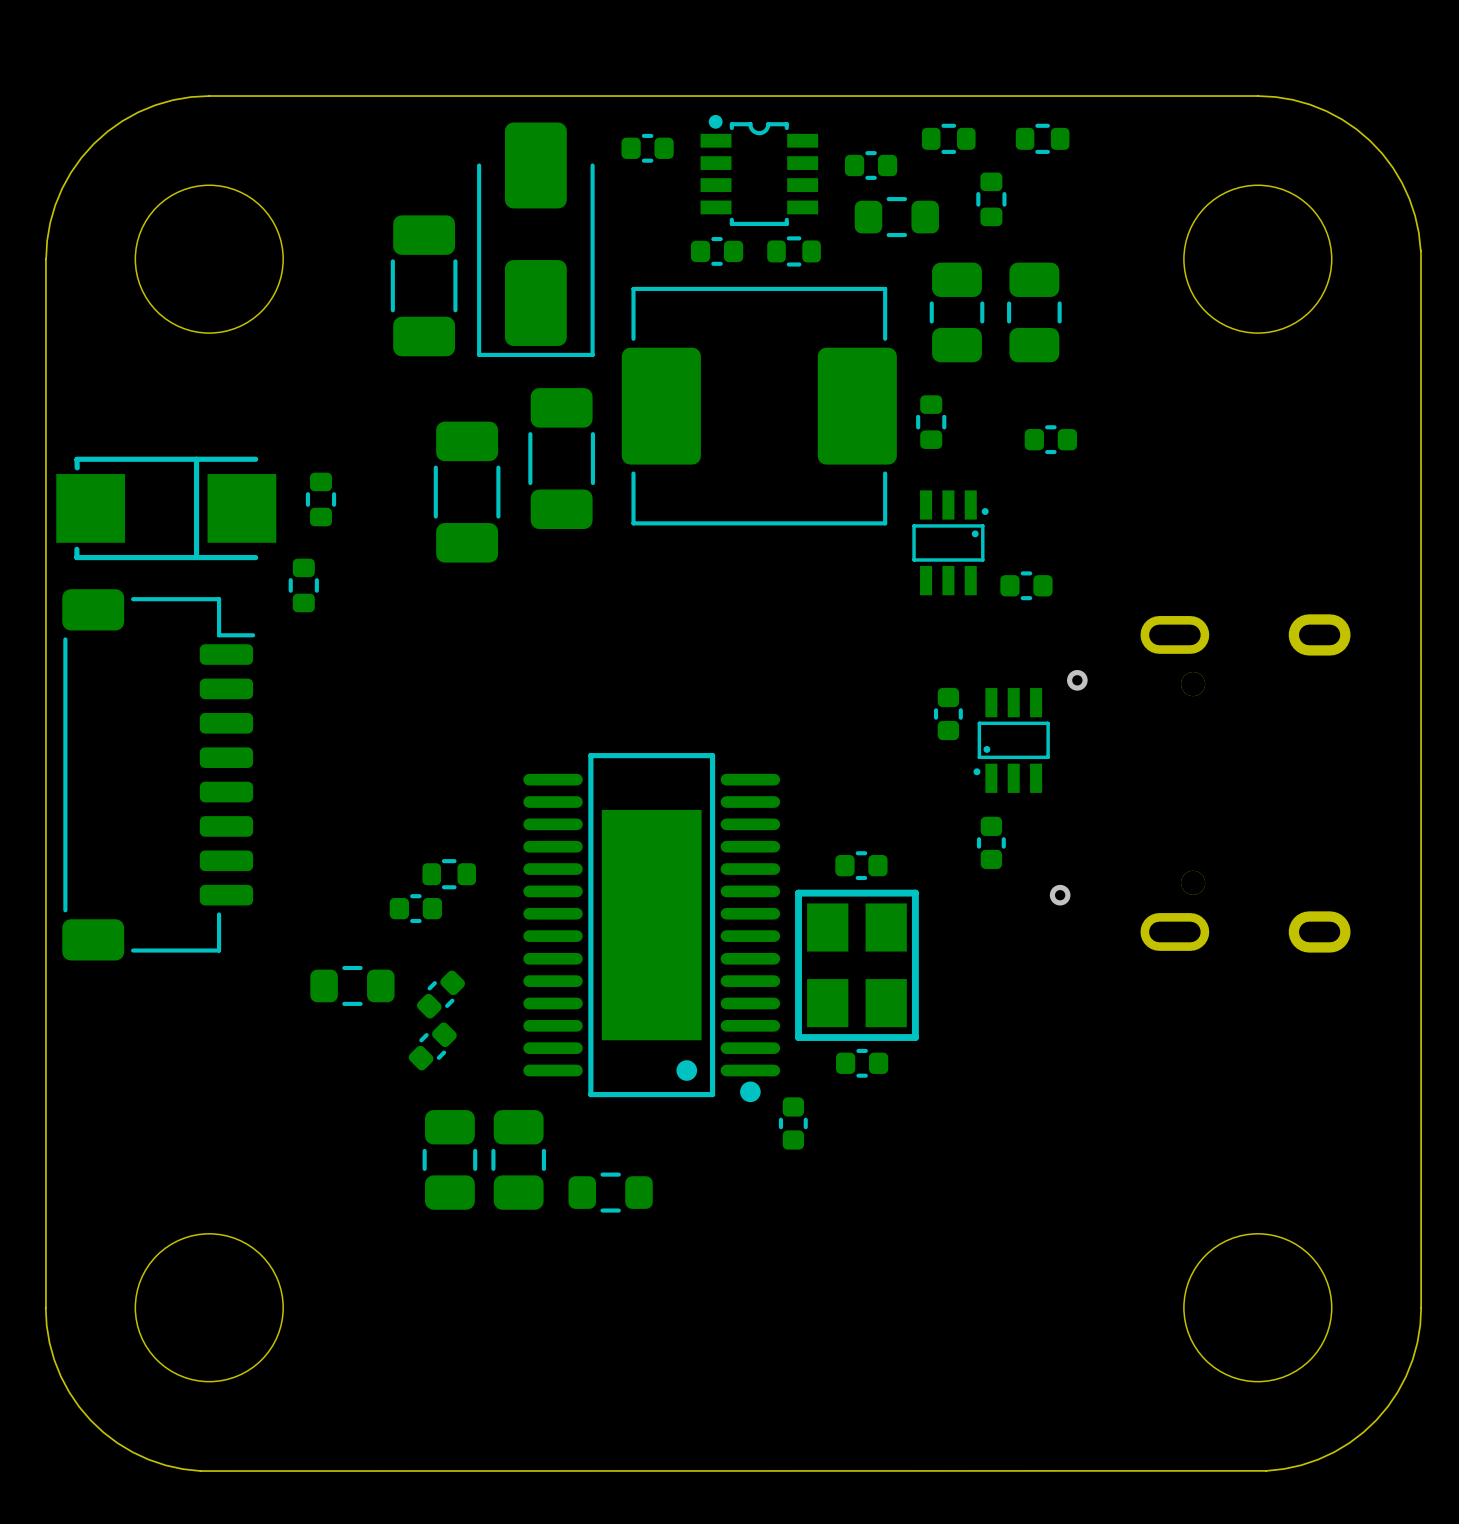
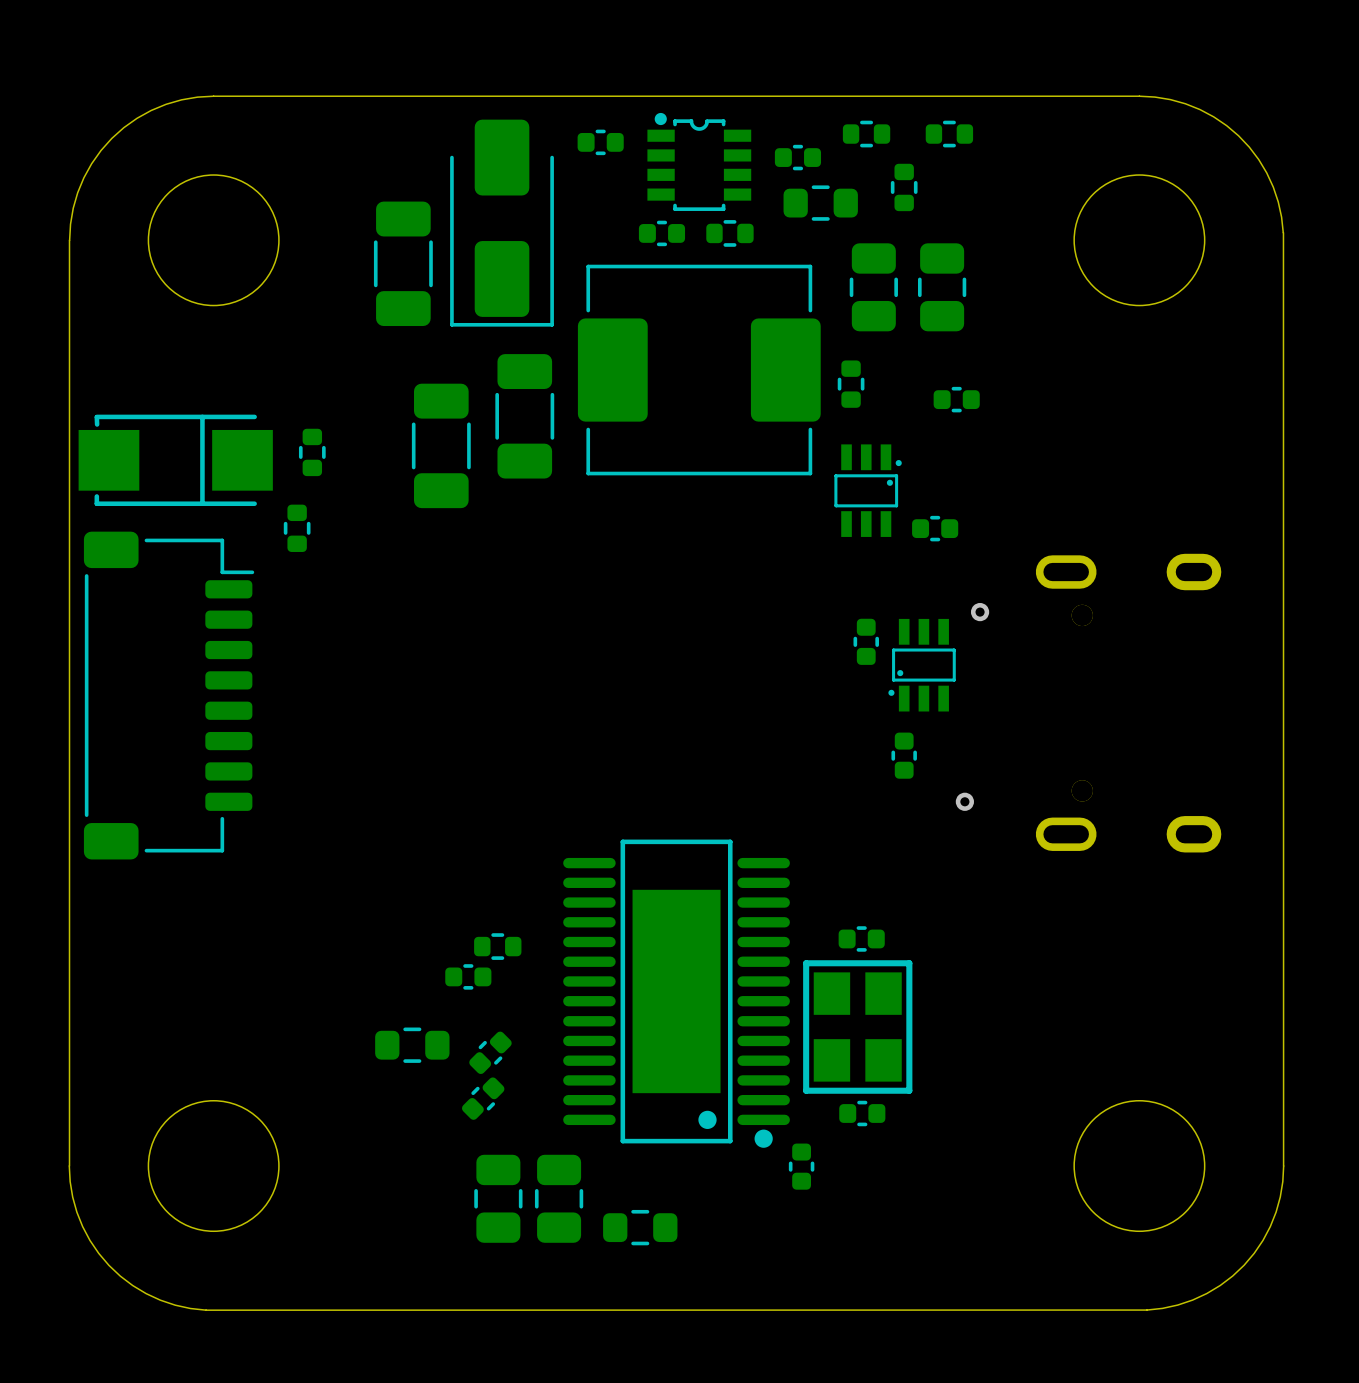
part: (861, 865) -> none
part position: (449, 874) -> (497, 946)
part: (415, 908) -> none
part position: (651, 927) -> (676, 993)
part position: (850, 965) -> (851, 1027)
part: (352, 985) -> none
part: (440, 994) -> none
part: (432, 1046) -> none
part position: (862, 1063) -> (861, 938)
part: none -> (468, 976)
part footprint: [422, 1110, 478, 1210] -> [375, 1027, 450, 1063]
part footprint: [491, 1110, 547, 1210] -> [469, 1031, 512, 1075]
part: (793, 1123) -> none
part position: (610, 1192) -> (640, 1227)
part: none -> (483, 1098)
part: none -> (862, 1113)
part: none -> (801, 1166)
part: none -> (498, 1198)
part: none -> (559, 1198)

